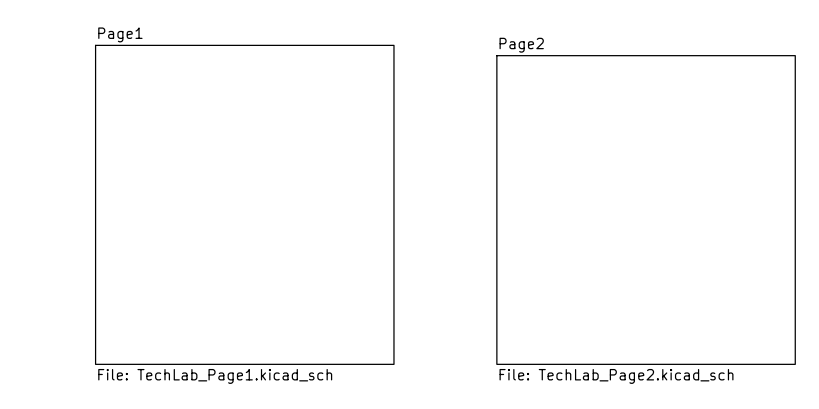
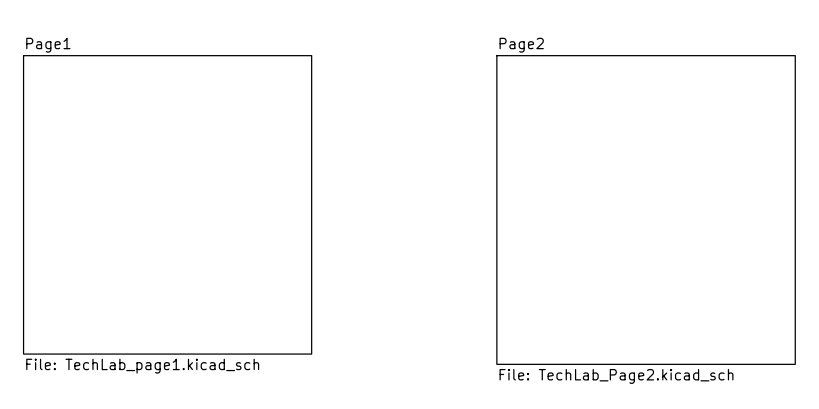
sheet Page1 shape: [94, 44, 395, 365] -> [22, 55, 313, 355]
sheet Page1 value: File: TechLab_Page1.kicad_sch (215, 376) -> File: TechLab_page1.kicad_sch (142, 366)

